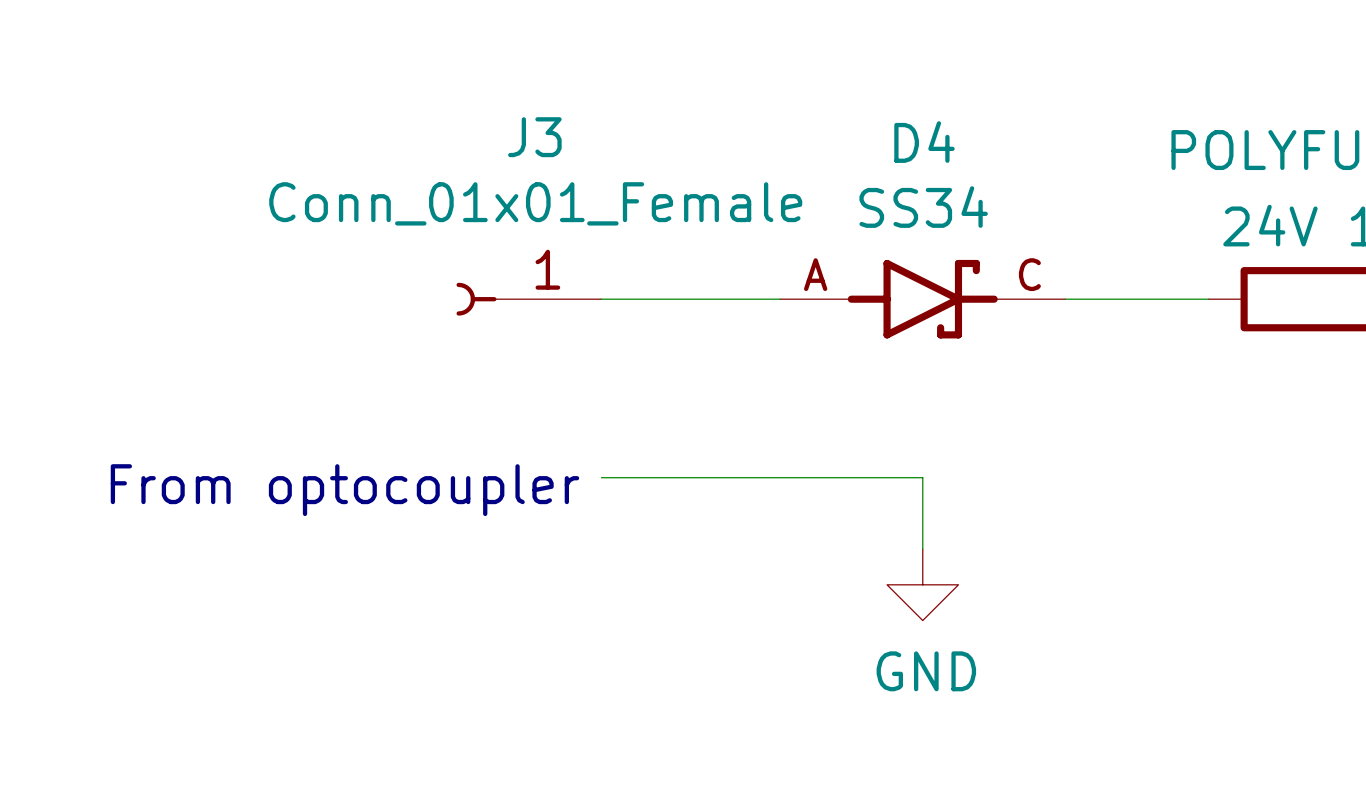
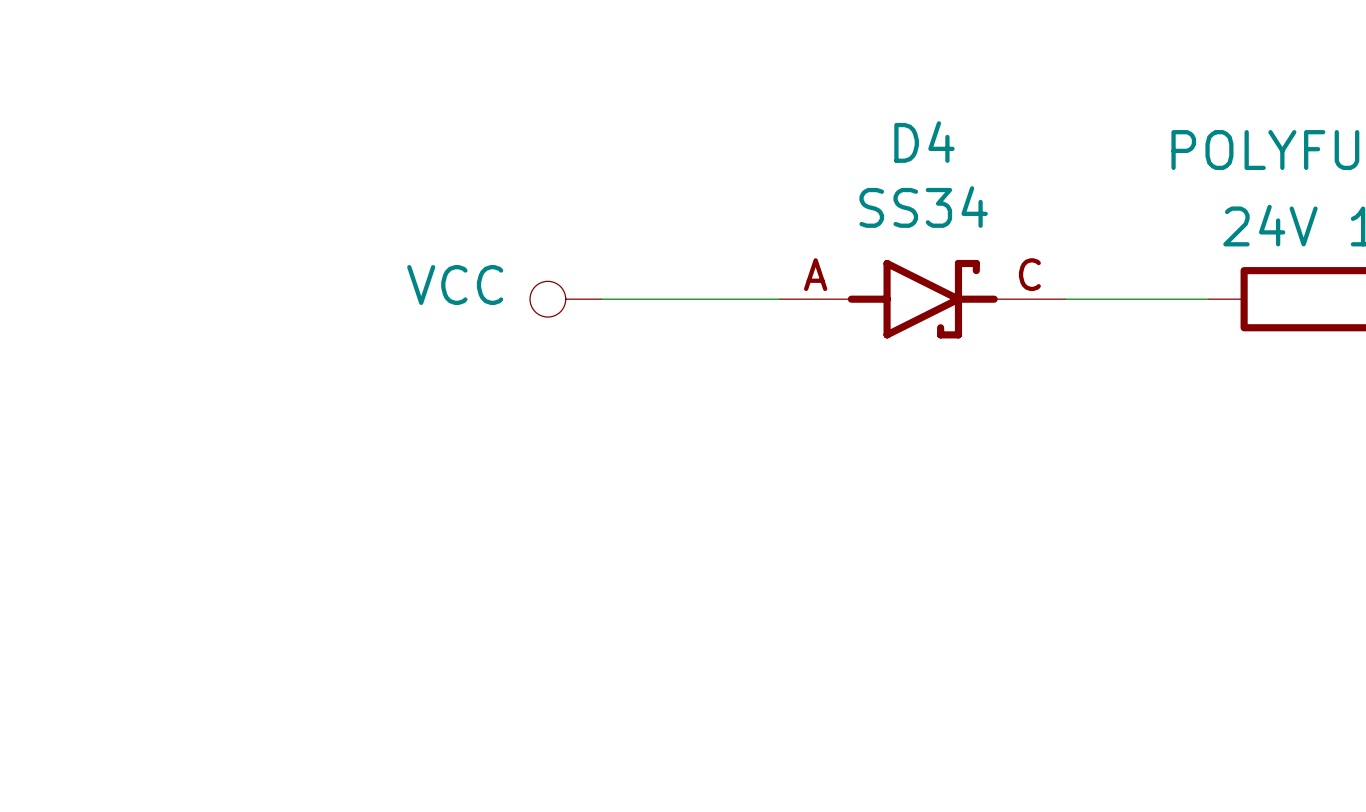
J3: Conn_01x01_Female (528, 299) -> none
power symbol: none -> VCC (565, 299)
wire: (601, 477) (922, 477) (922, 549) -> none
text: From optocoupler (344, 490) -> none
power symbol: GND (922, 584) -> none

